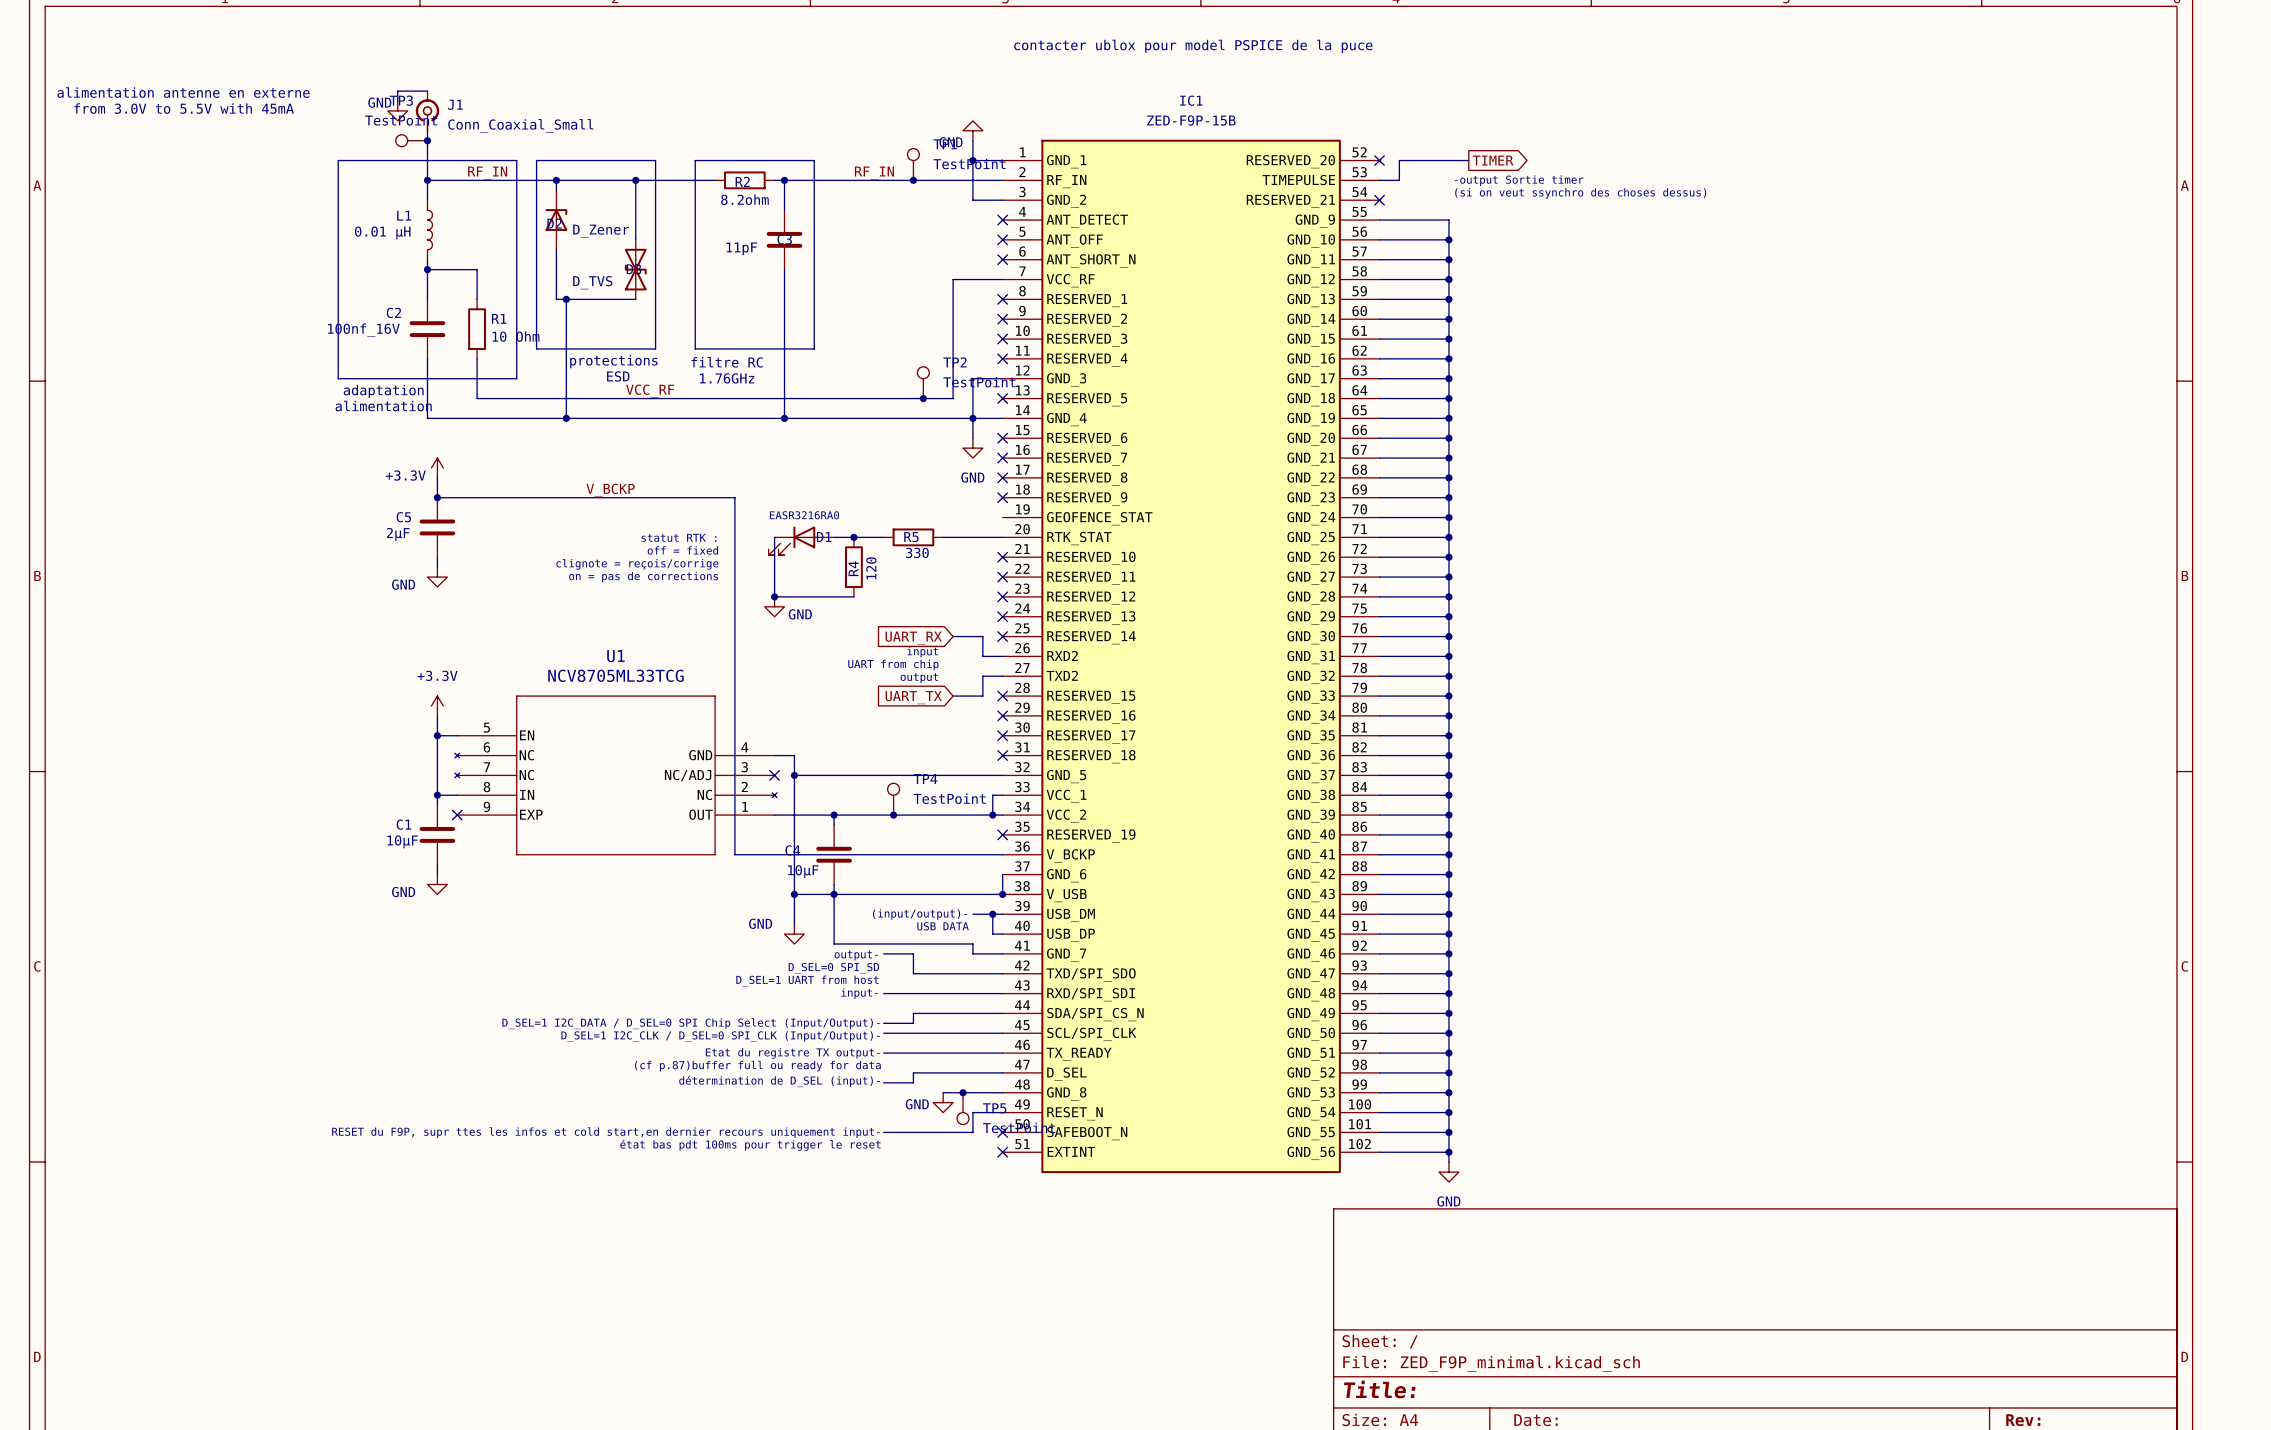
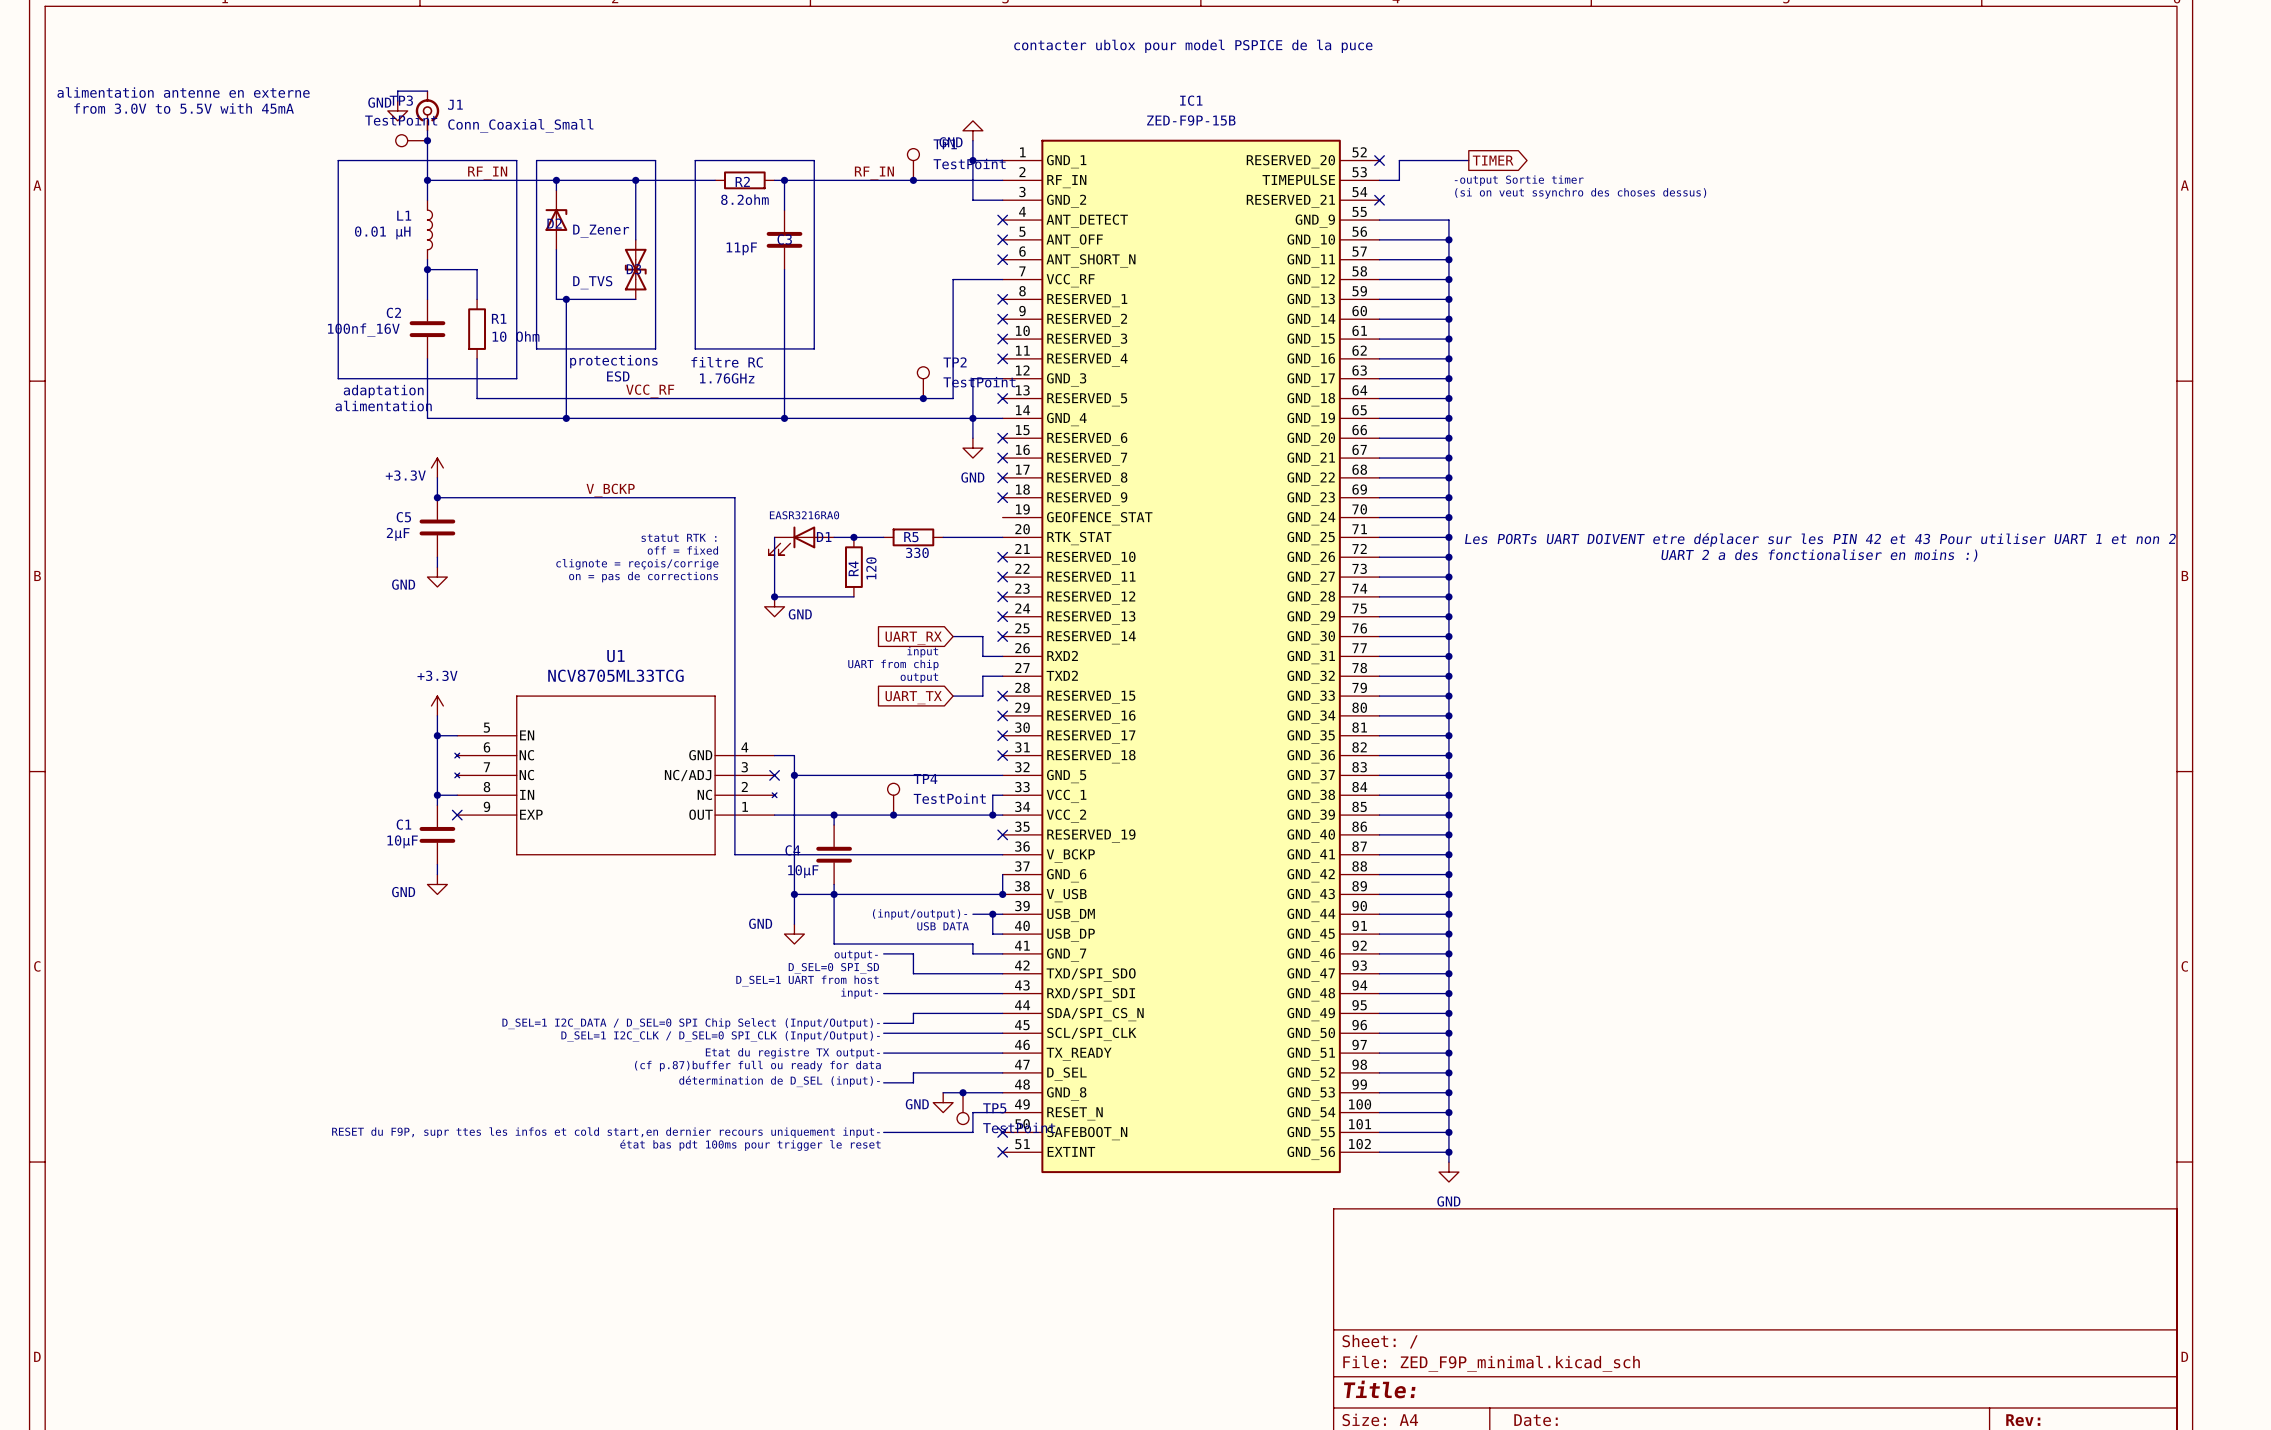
text: none -> Les PORTs UART DOIVENT etre déplacer sur les PIN 42 et 43 Pour utiliser UART 1 et non 2 (1820, 539)
text: none -> UART 2 a des fonctionaliser en moins :) (1819, 555)

